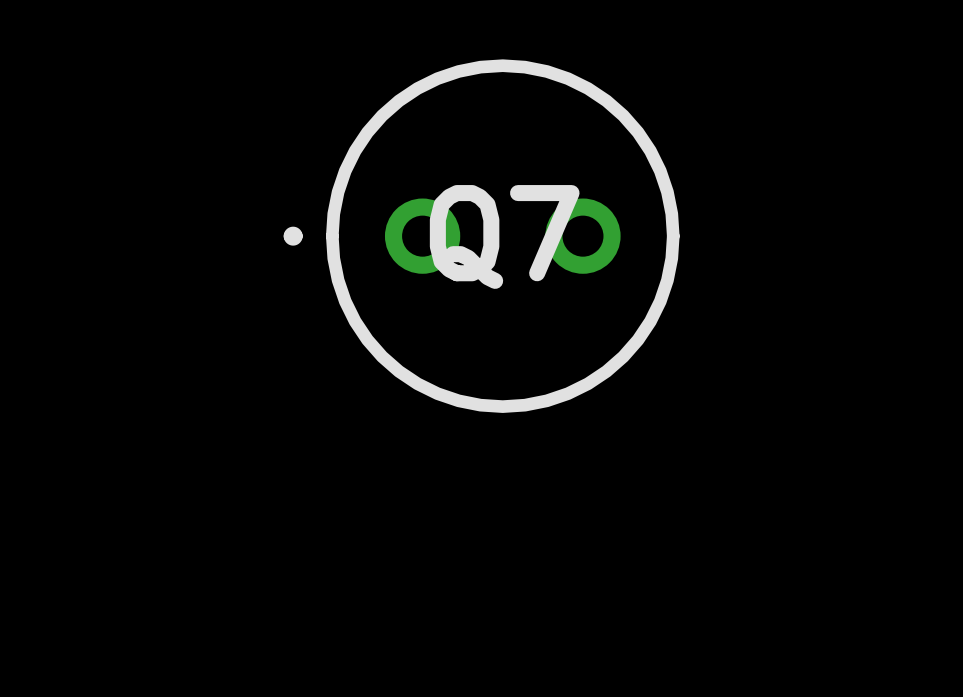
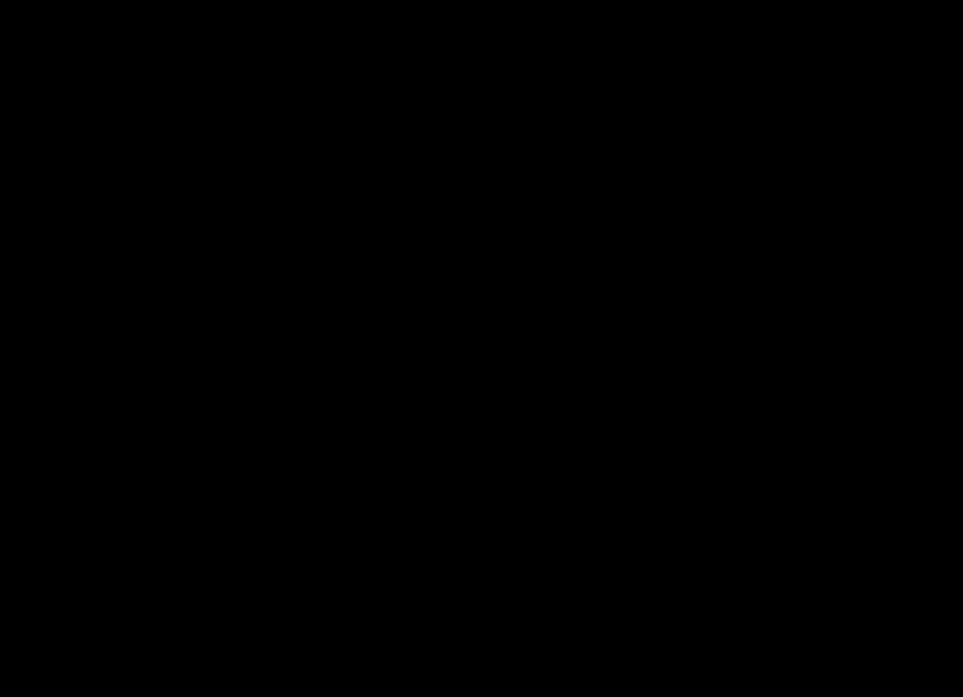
Q7: (481, 236) -> none

